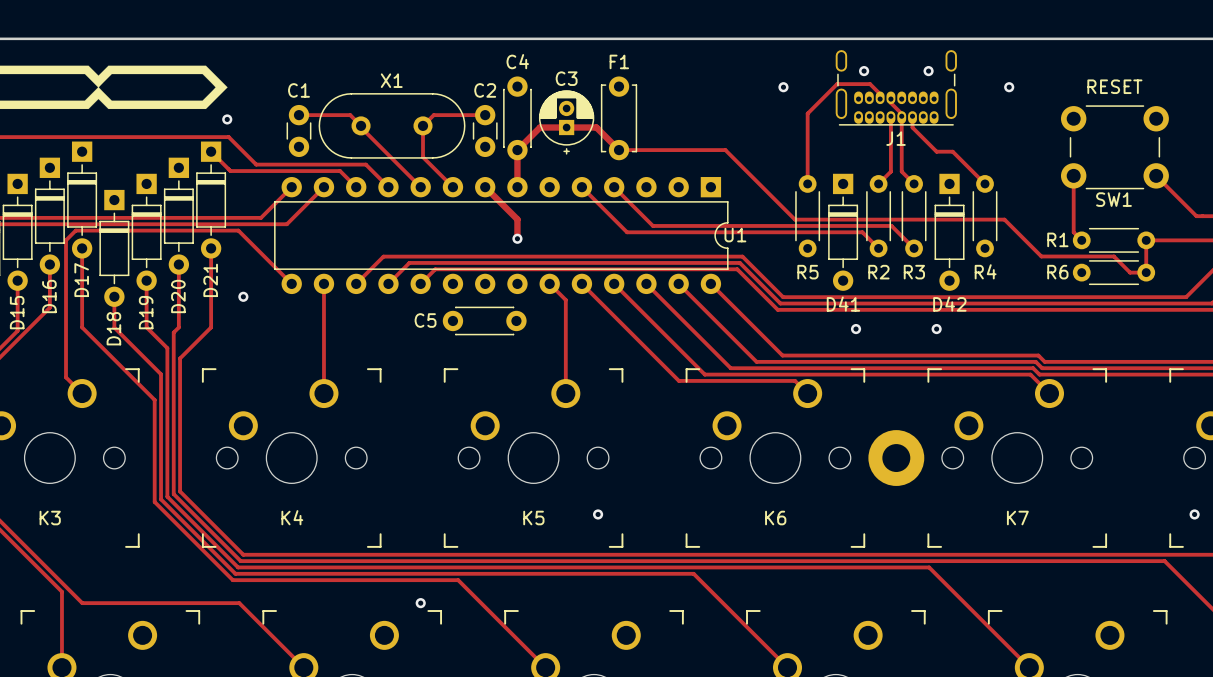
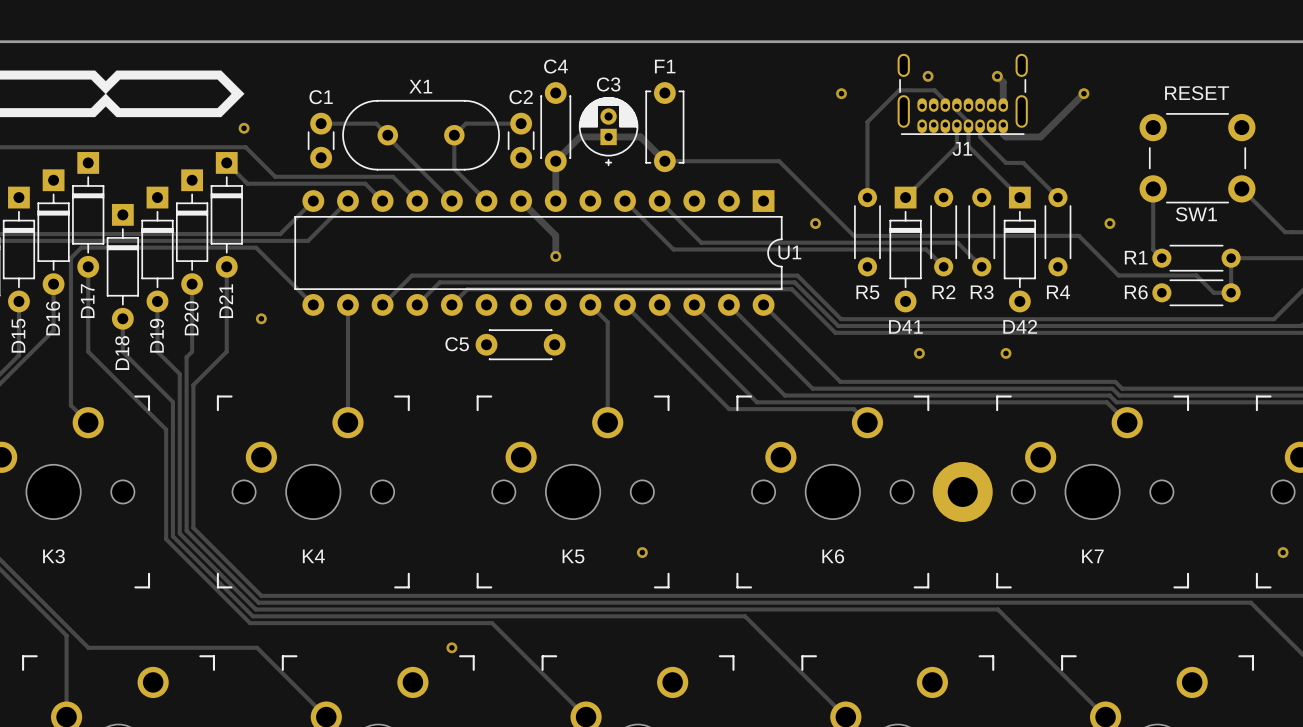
track: none -> (997, 76) (1003, 82) (1003, 106)
track: none -> (1083, 93) (1040, 136) (1006, 136) (1003, 134) (1003, 124)
track: (890, 136) (890, 171) (878, 183) -> (956, 146) (905, 197)
track: (901, 136) (901, 171) (914, 183) -> (968, 146) (1019, 197)
via: none -> (815, 223)
via: none -> (1109, 223)

